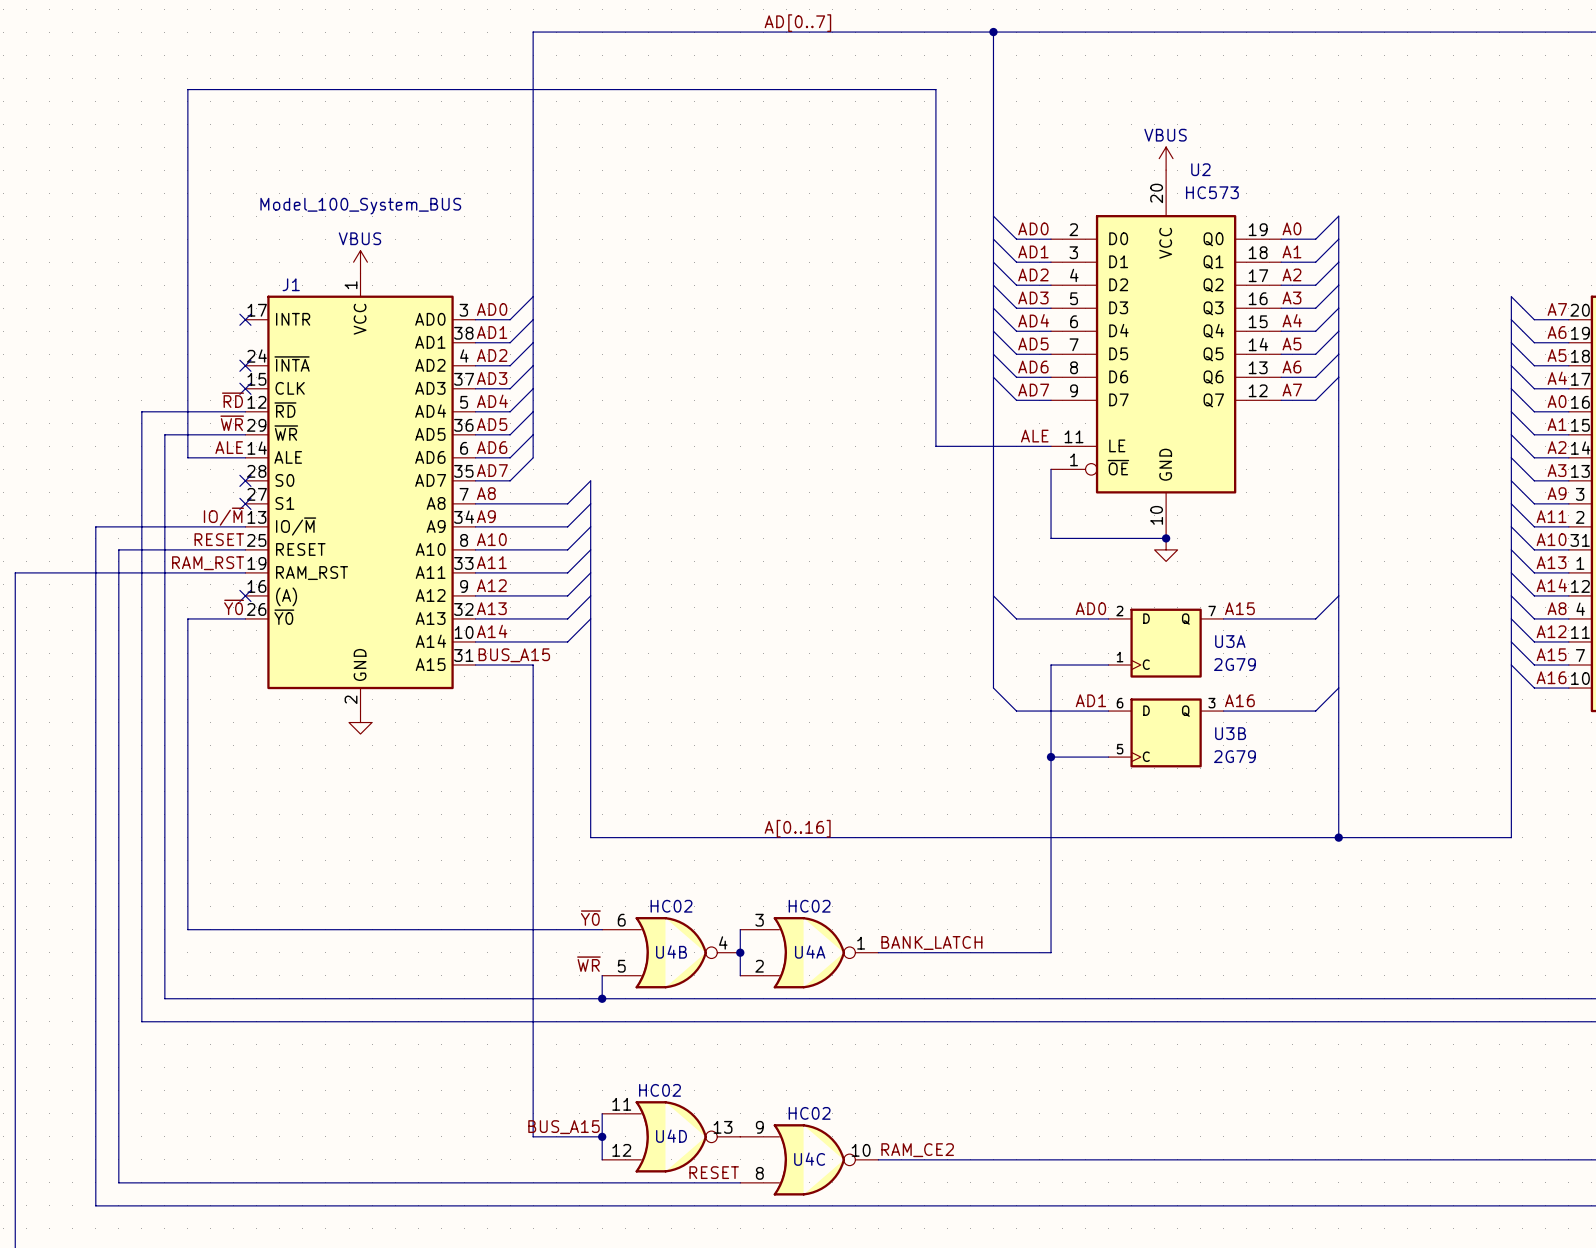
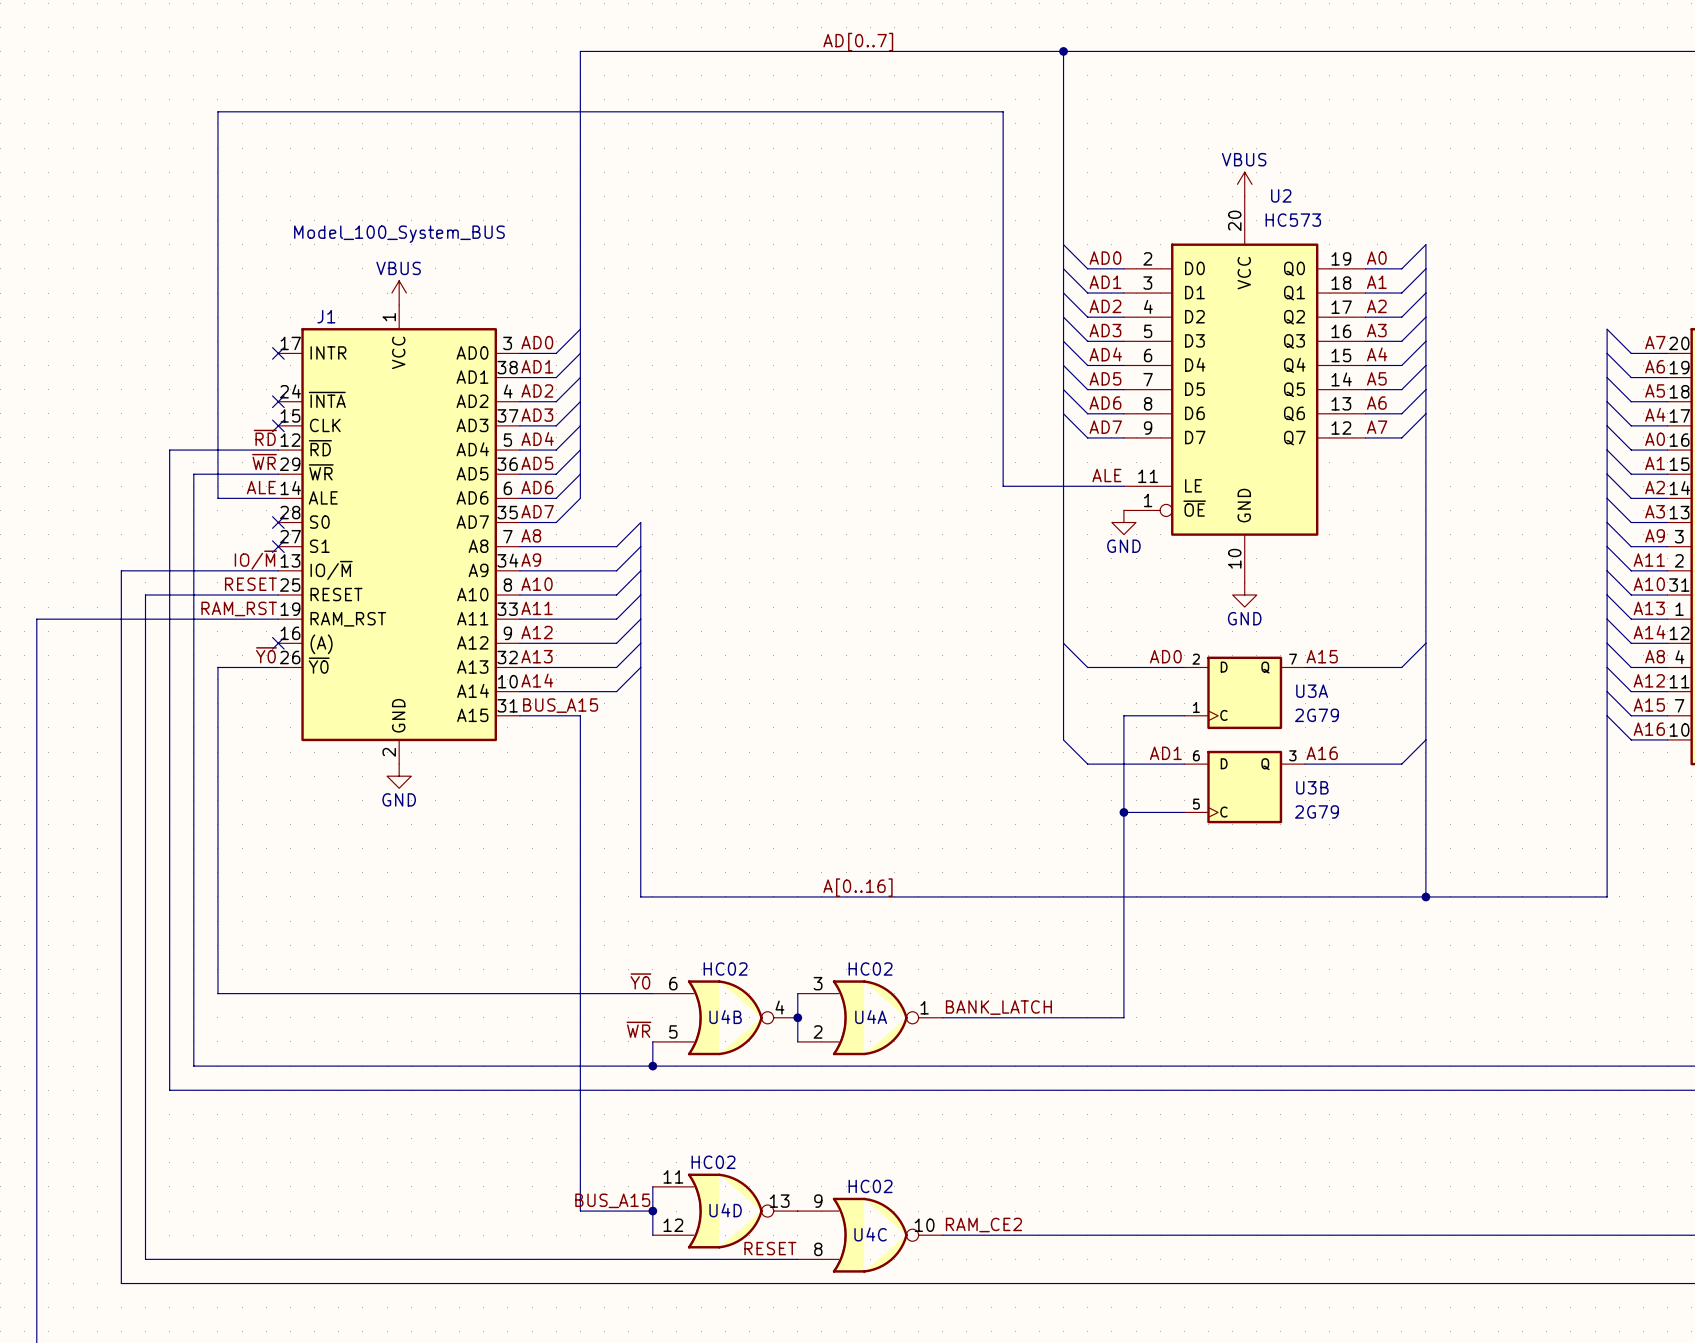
wire: (1051, 469) (1051, 538) (1166, 538) -> none
power symbol: none -> GND (1123, 522)
junction: (1166, 538) -> none
power symbol text: none -> GND (1244, 618)
power symbol text: none -> GND (399, 799)

